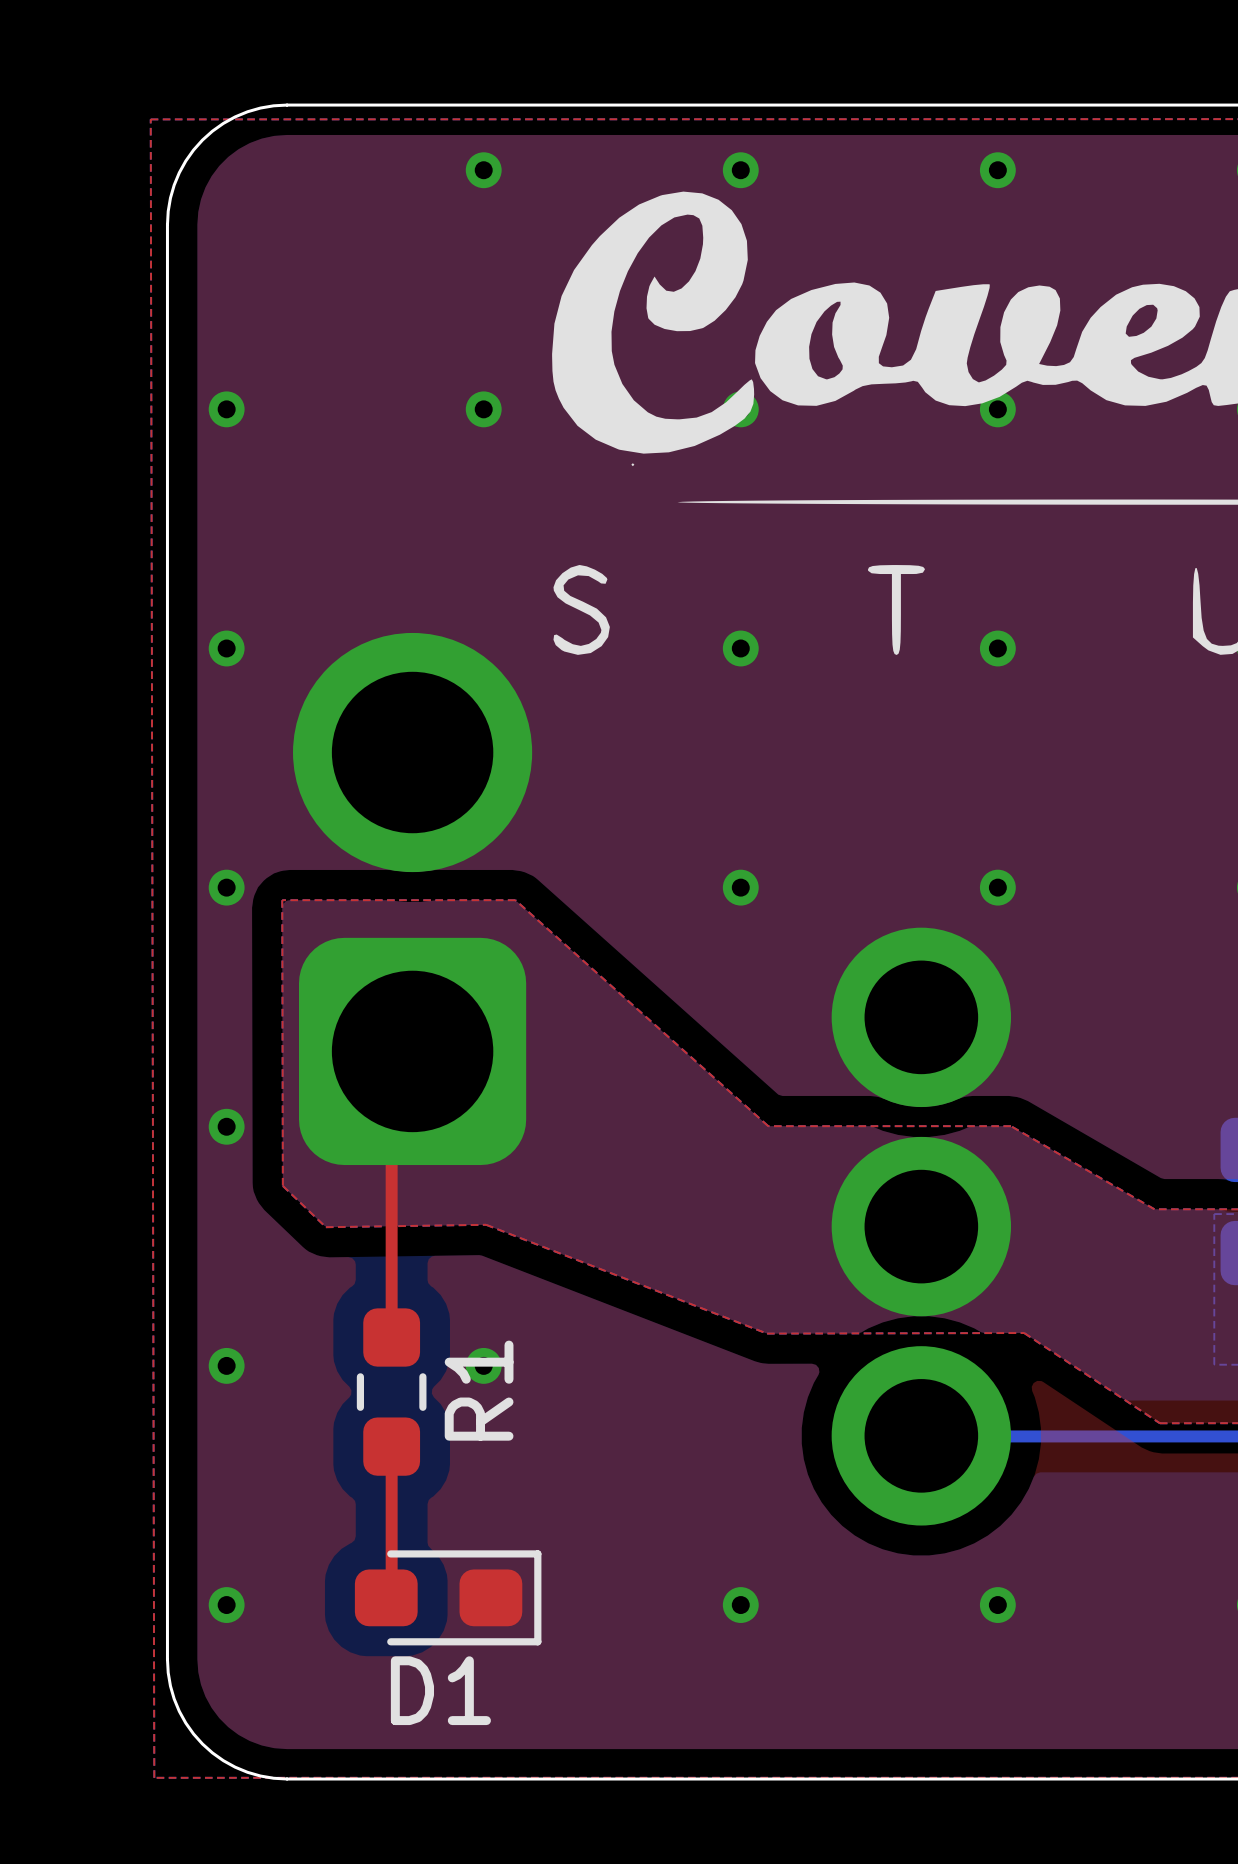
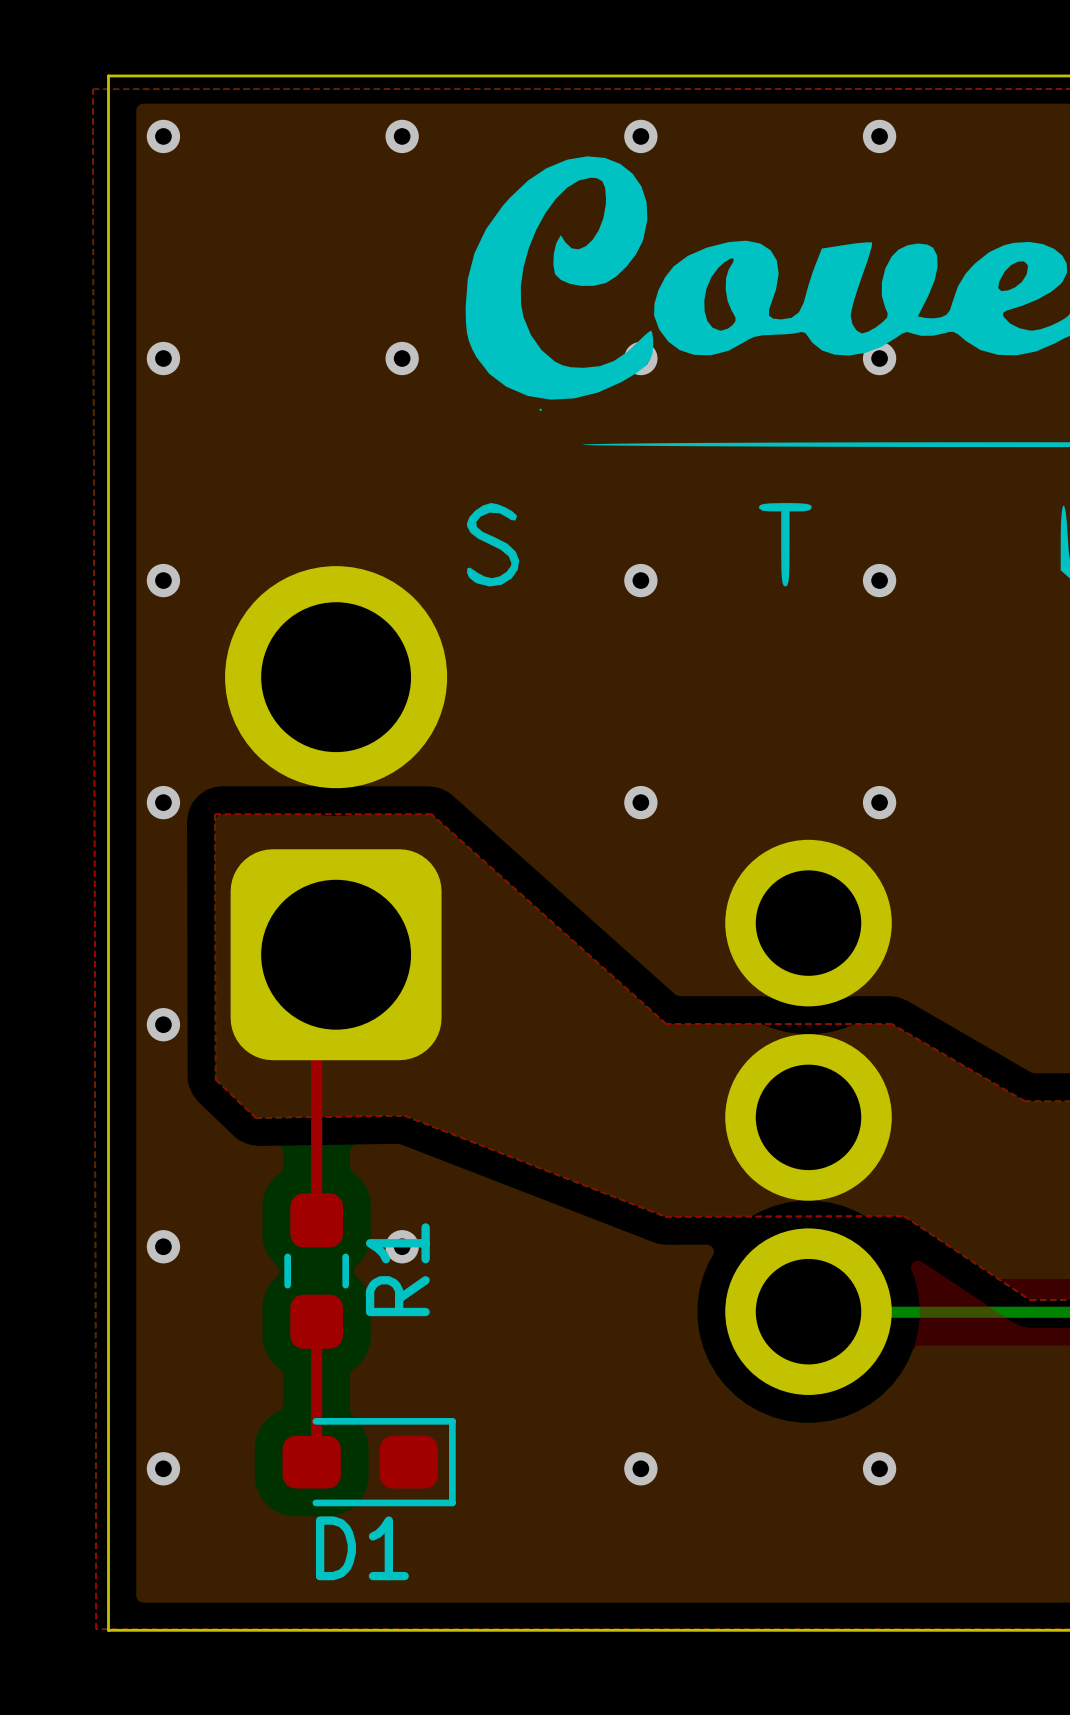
board edge: (287, 105) (260, 108) (235, 116) (223, 123) (202, 140) (185, 161) (174, 185) (168, 211) (167, 224) -> (219, 75) (108, 75) (108, 186)
via: none -> (163, 136)
board edge: (167, 1659) (170, 1686) (179, 1711) (193, 1733) (202, 1743) (223, 1760) (247, 1772) (260, 1776) (287, 1779) -> (108, 1519) (108, 1630) (219, 1630)

